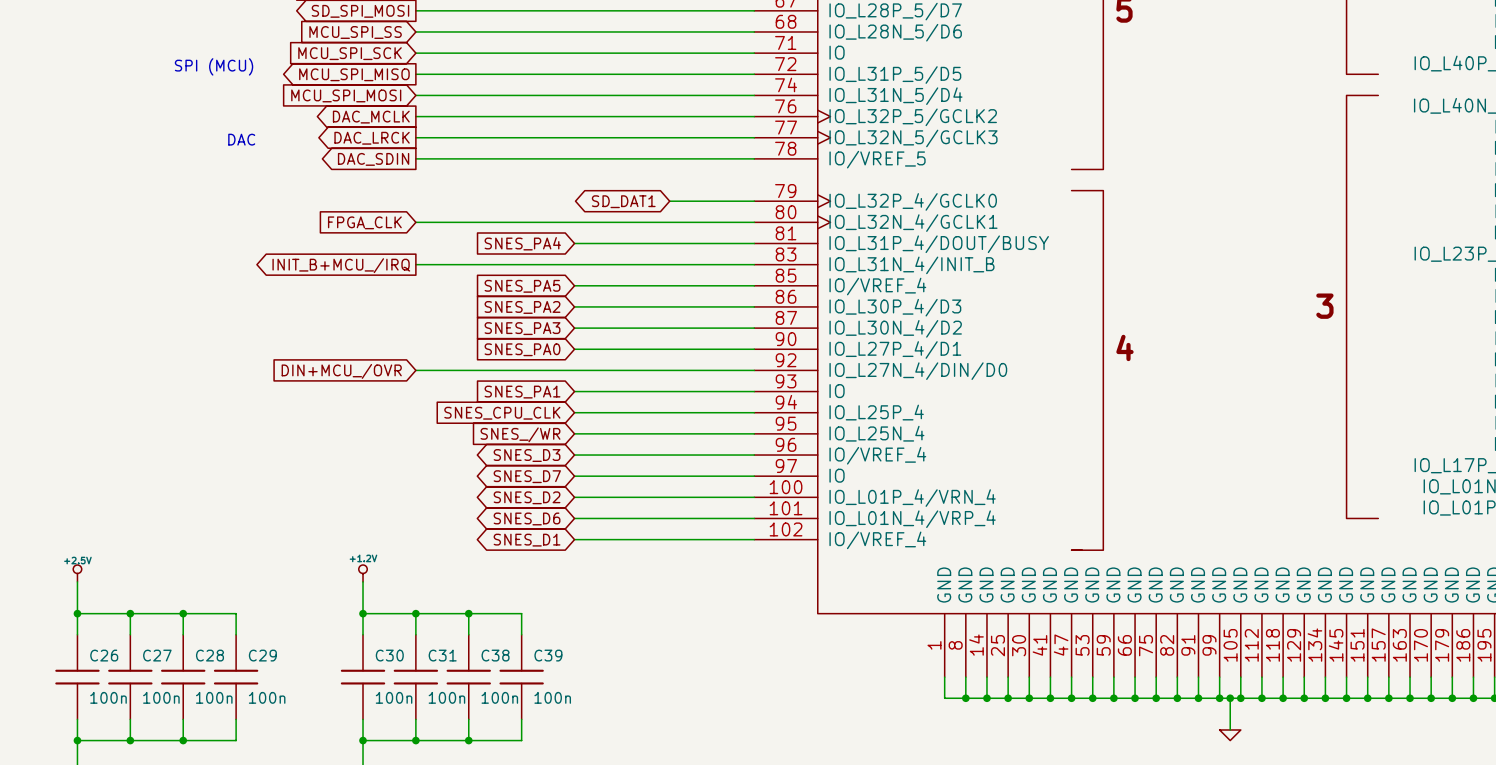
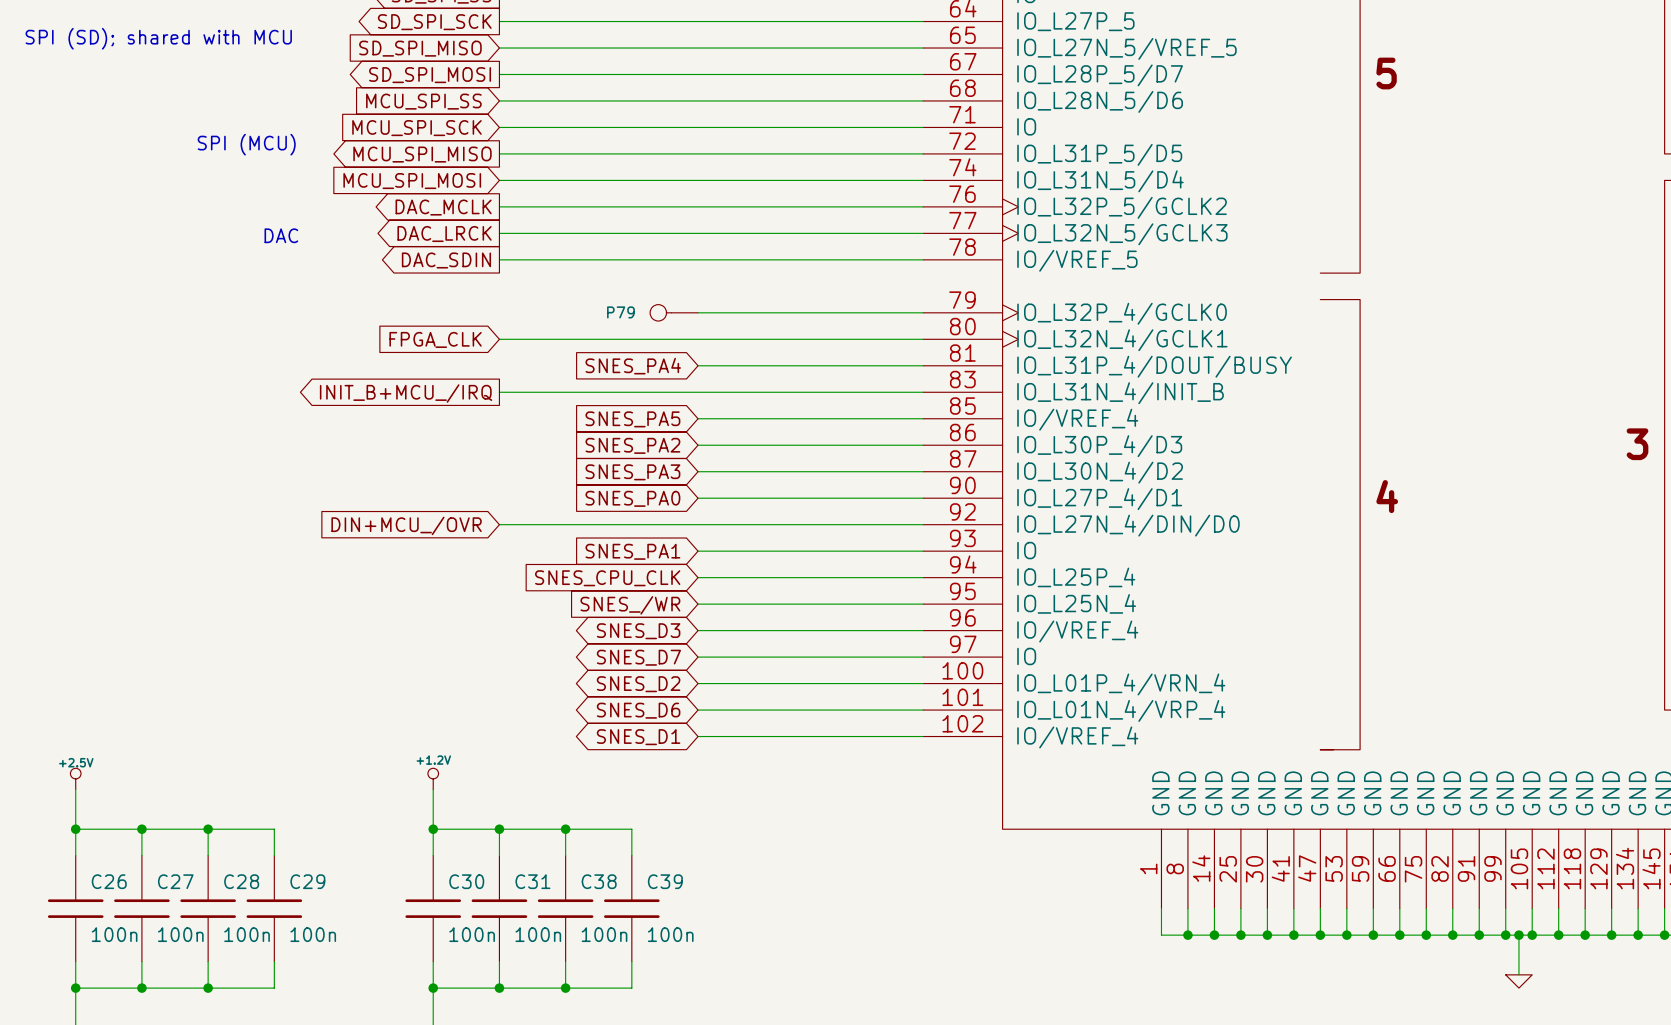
P79: none -> (674, 312)
wire: none -> (698, 312) (817, 312)
global label: SD_DAT1 (623, 201) -> none

